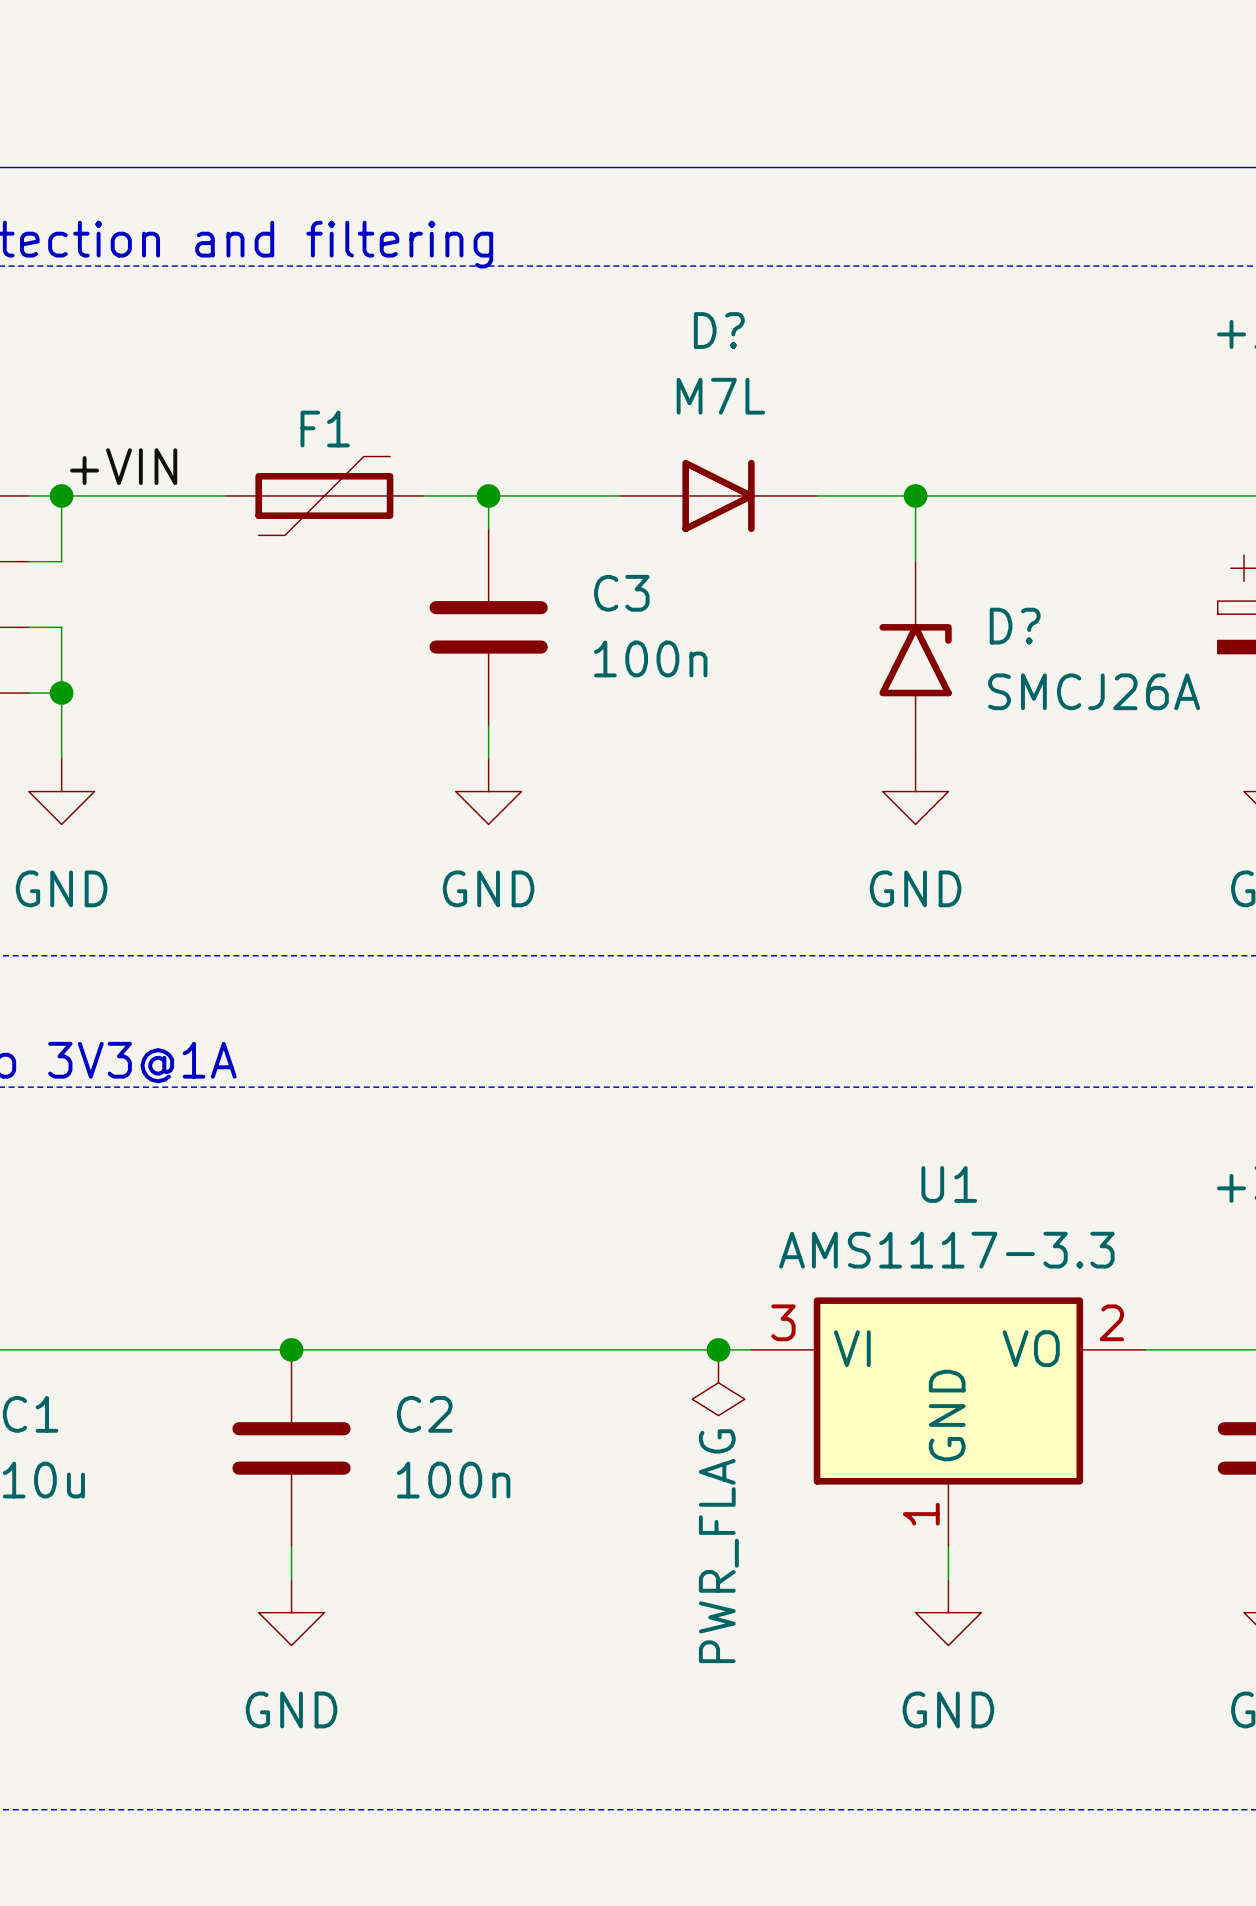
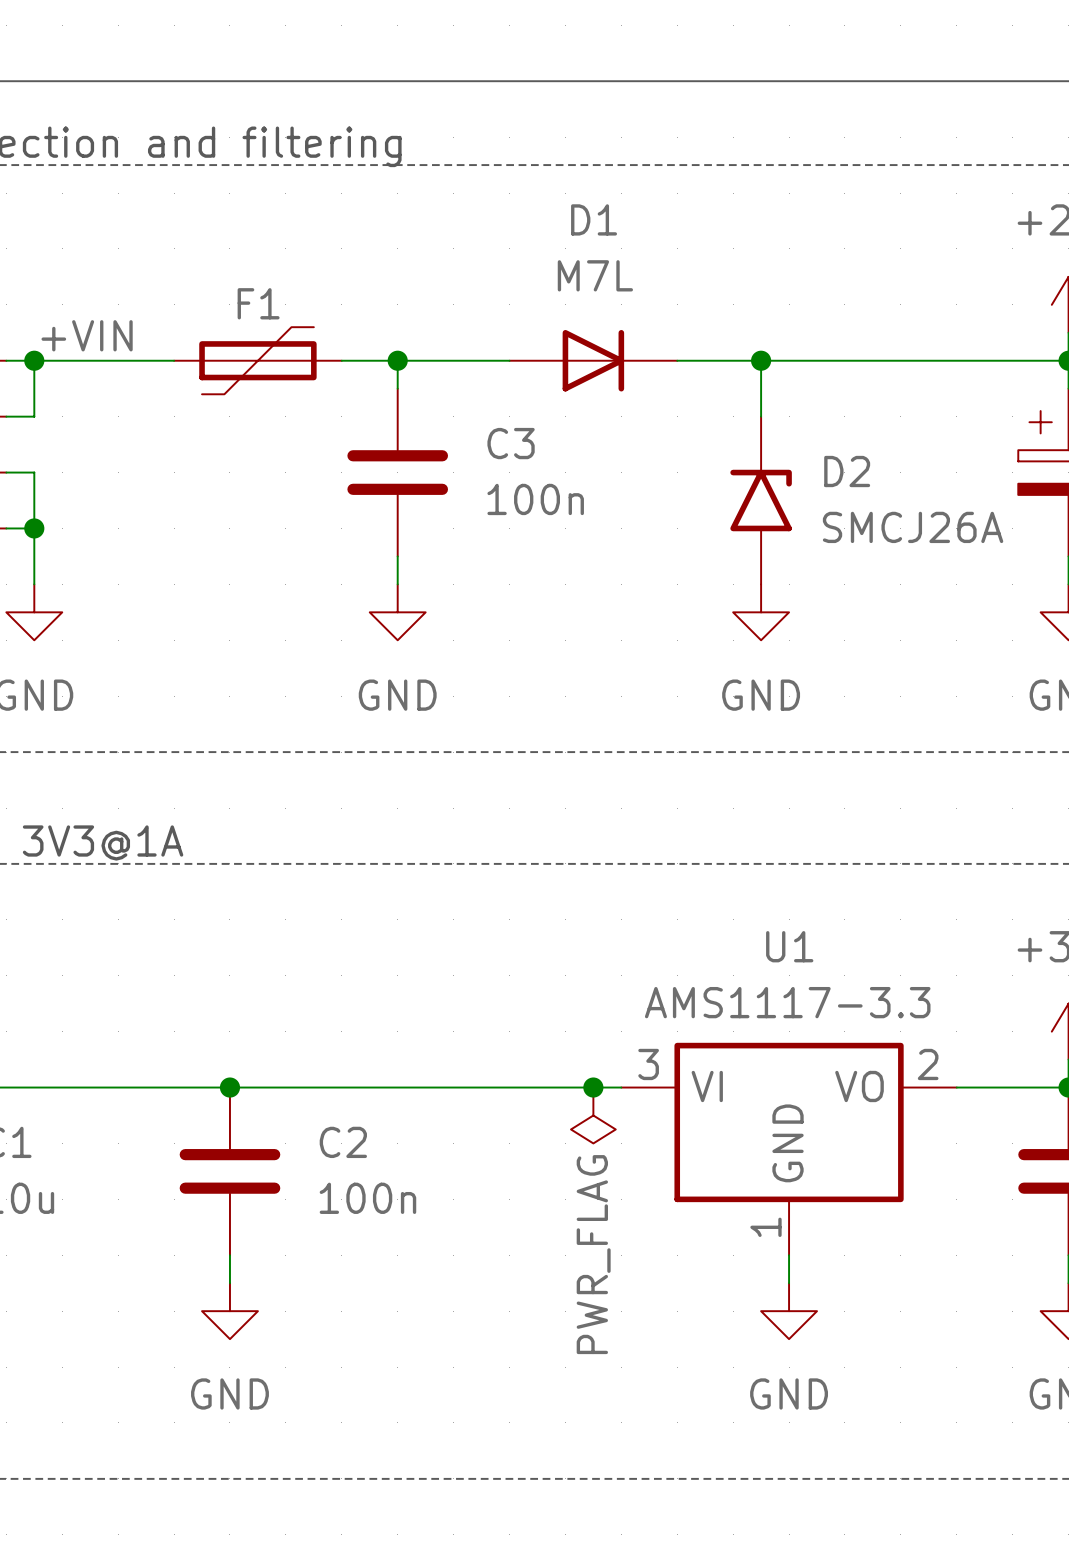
D? name: D? (719, 330) -> D1 (594, 219)
D? name: D? (1015, 626) -> D2 (847, 471)

